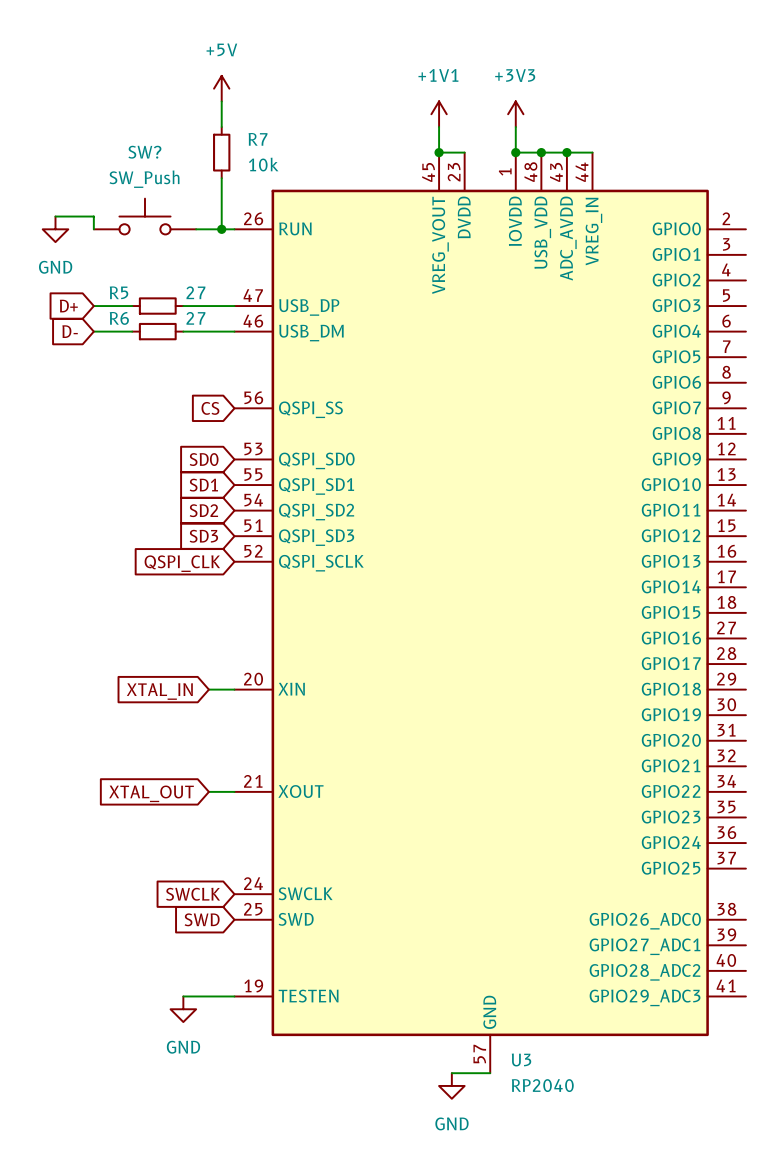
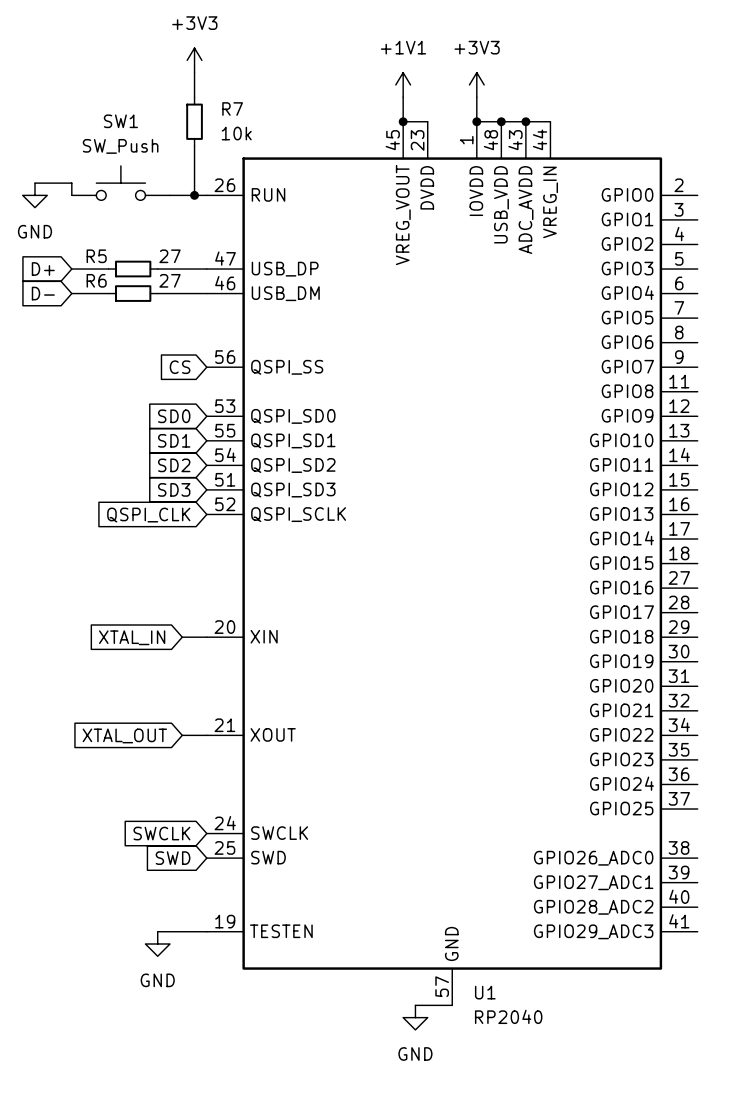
power symbol: +5V (221, 88) -> +3V3 (194, 60)
SW? name: SW? (144, 152) -> SW1 (120, 121)
U3 name: U3 (521, 1059) -> U1 (485, 992)

